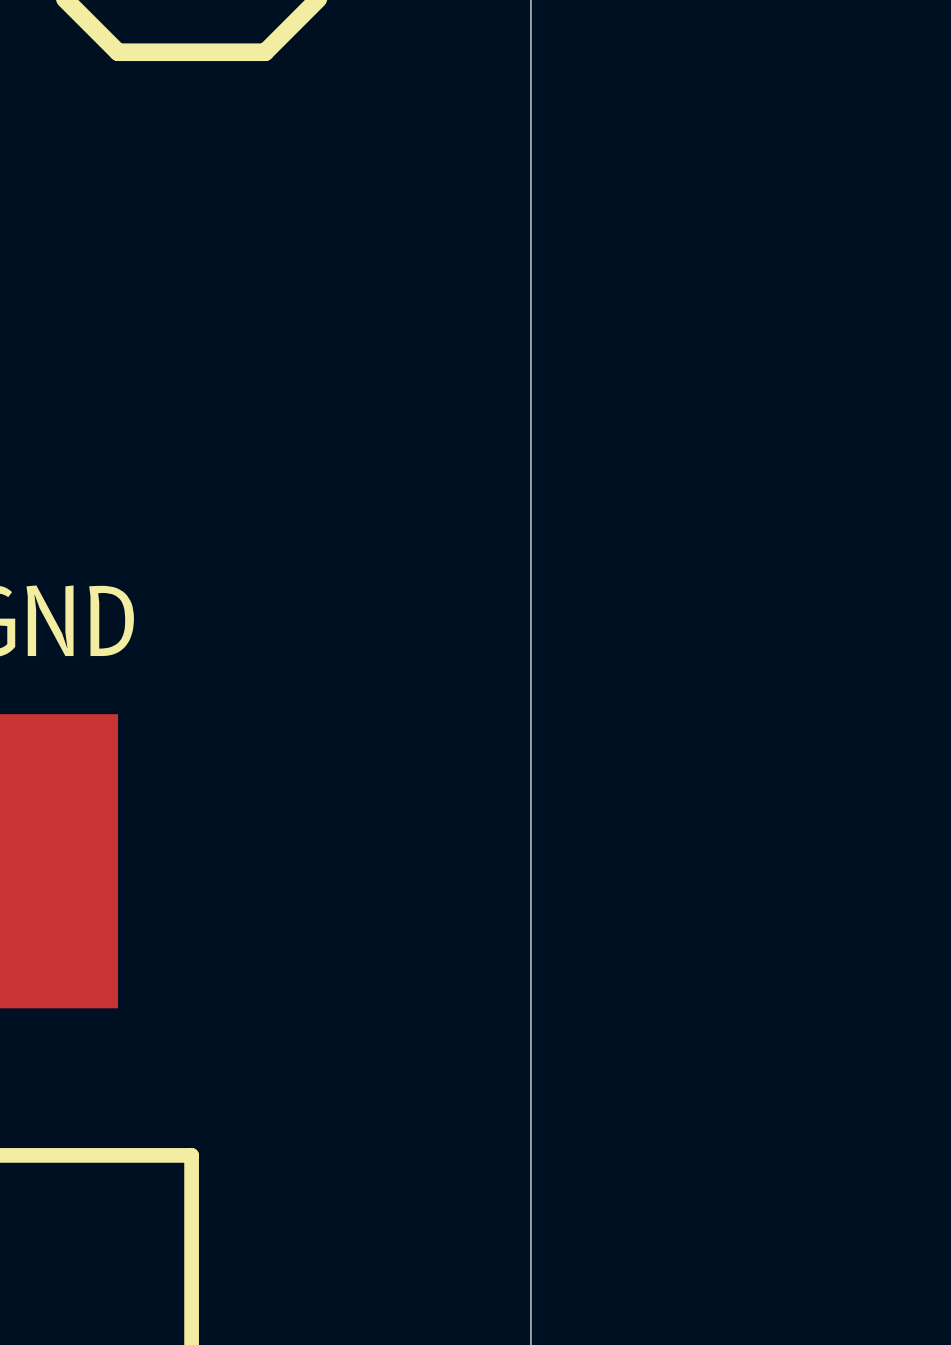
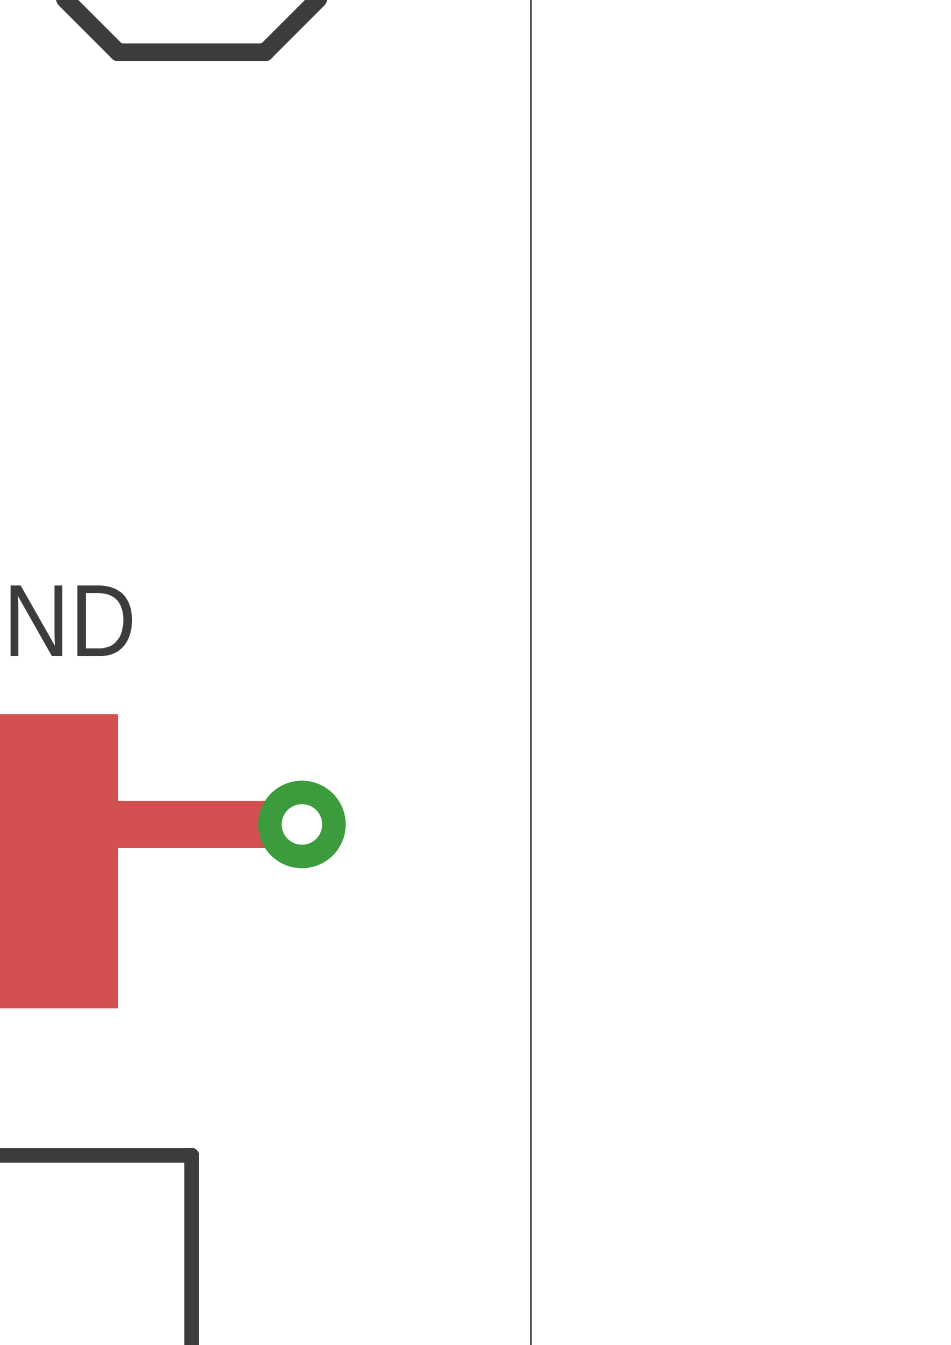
track: none -> (301, 824) (81, 824) (44, 861)
via: none -> (301, 824)

